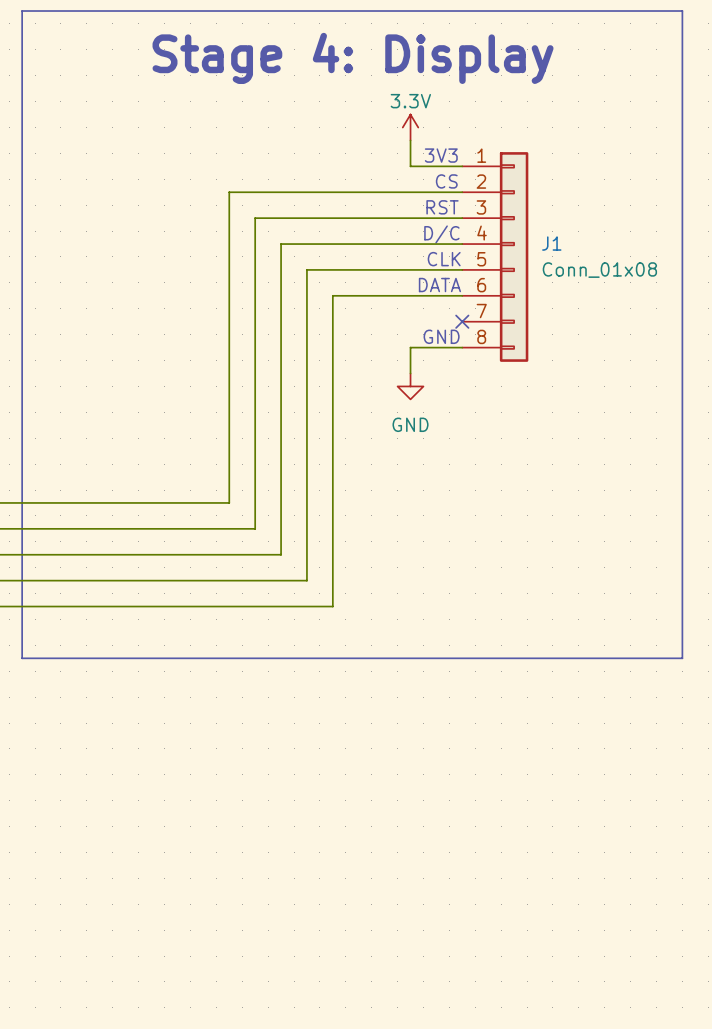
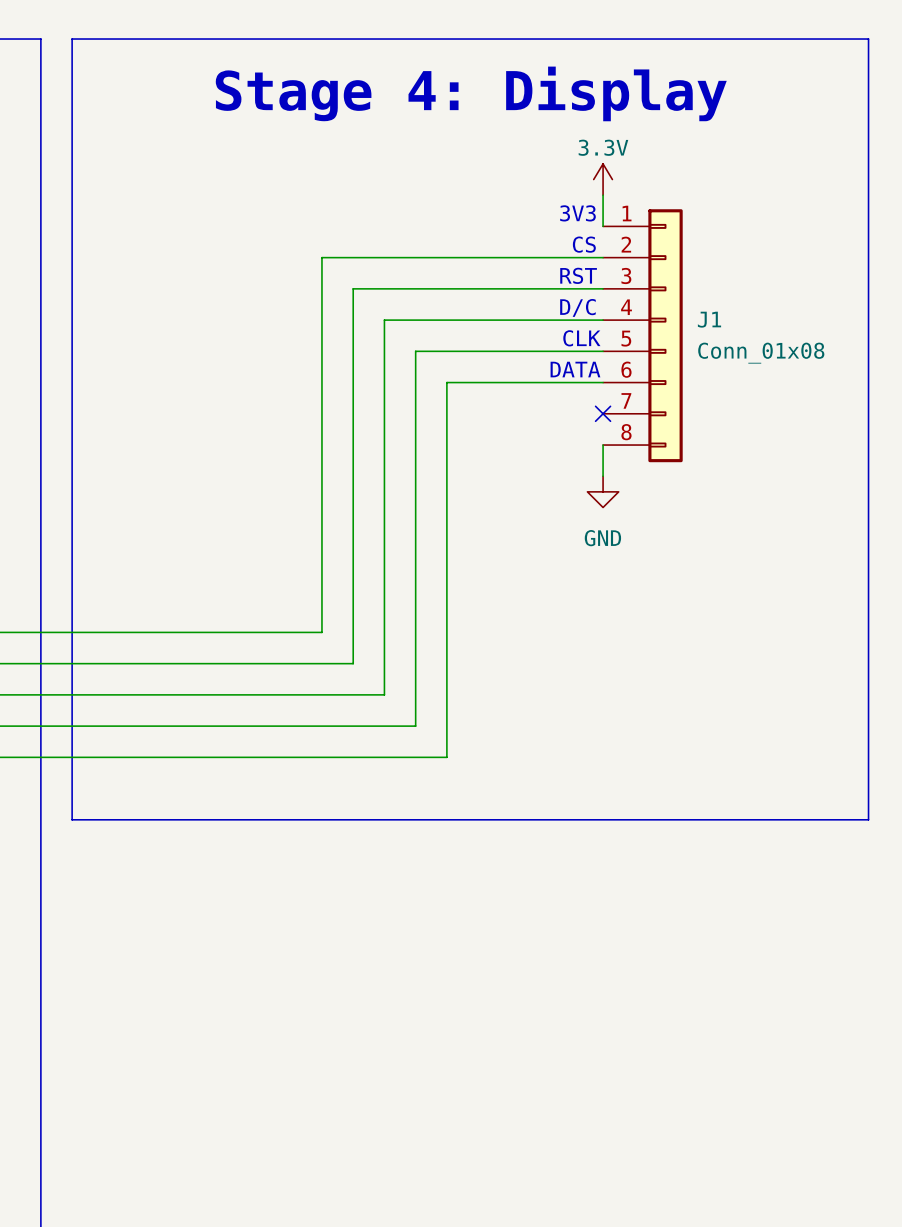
power symbol position: 3.3V (410, 127) -> 3.3V (603, 179)
wire: (410, 140) (410, 166) (462, 166) -> (603, 195) (603, 226)
text: GND (441, 336) -> none
wire: (462, 347) (410, 347) (410, 373) -> (603, 445) (603, 476)
power symbol position: GND (410, 386) -> GND (603, 491)

